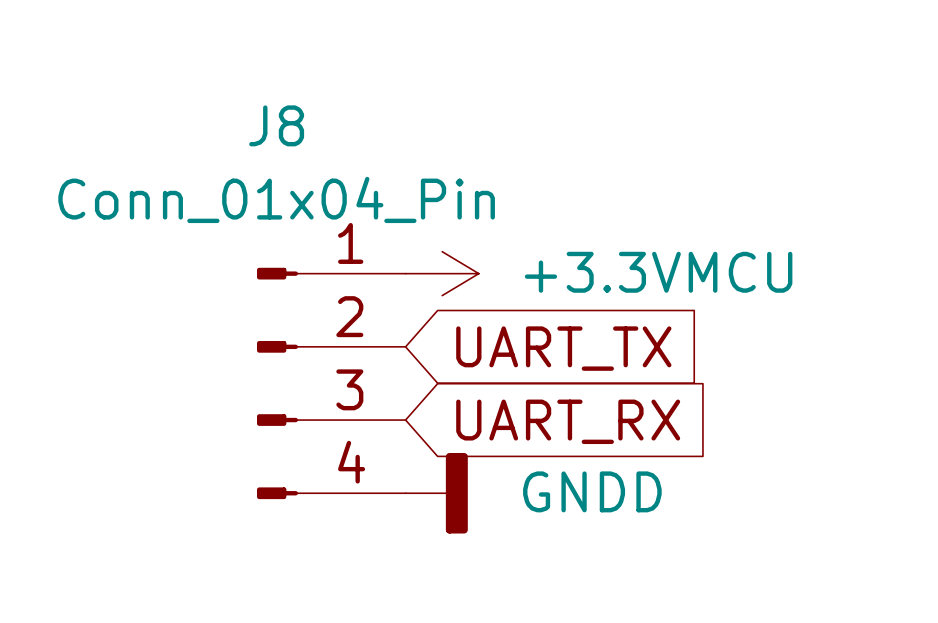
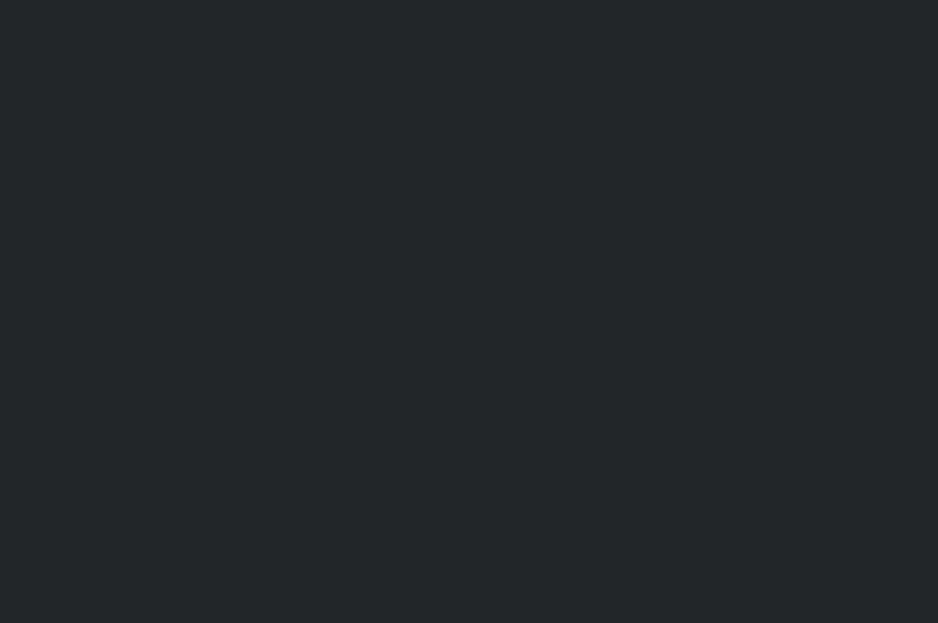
power symbol: +3.3VMCU (442, 273) -> none
global label: UART_TX (563, 348) -> none
J8: Conn_01x04_Pin (331, 383) -> none
global label: UART_RX (568, 421) -> none
power symbol: GNDD (436, 493) -> none

